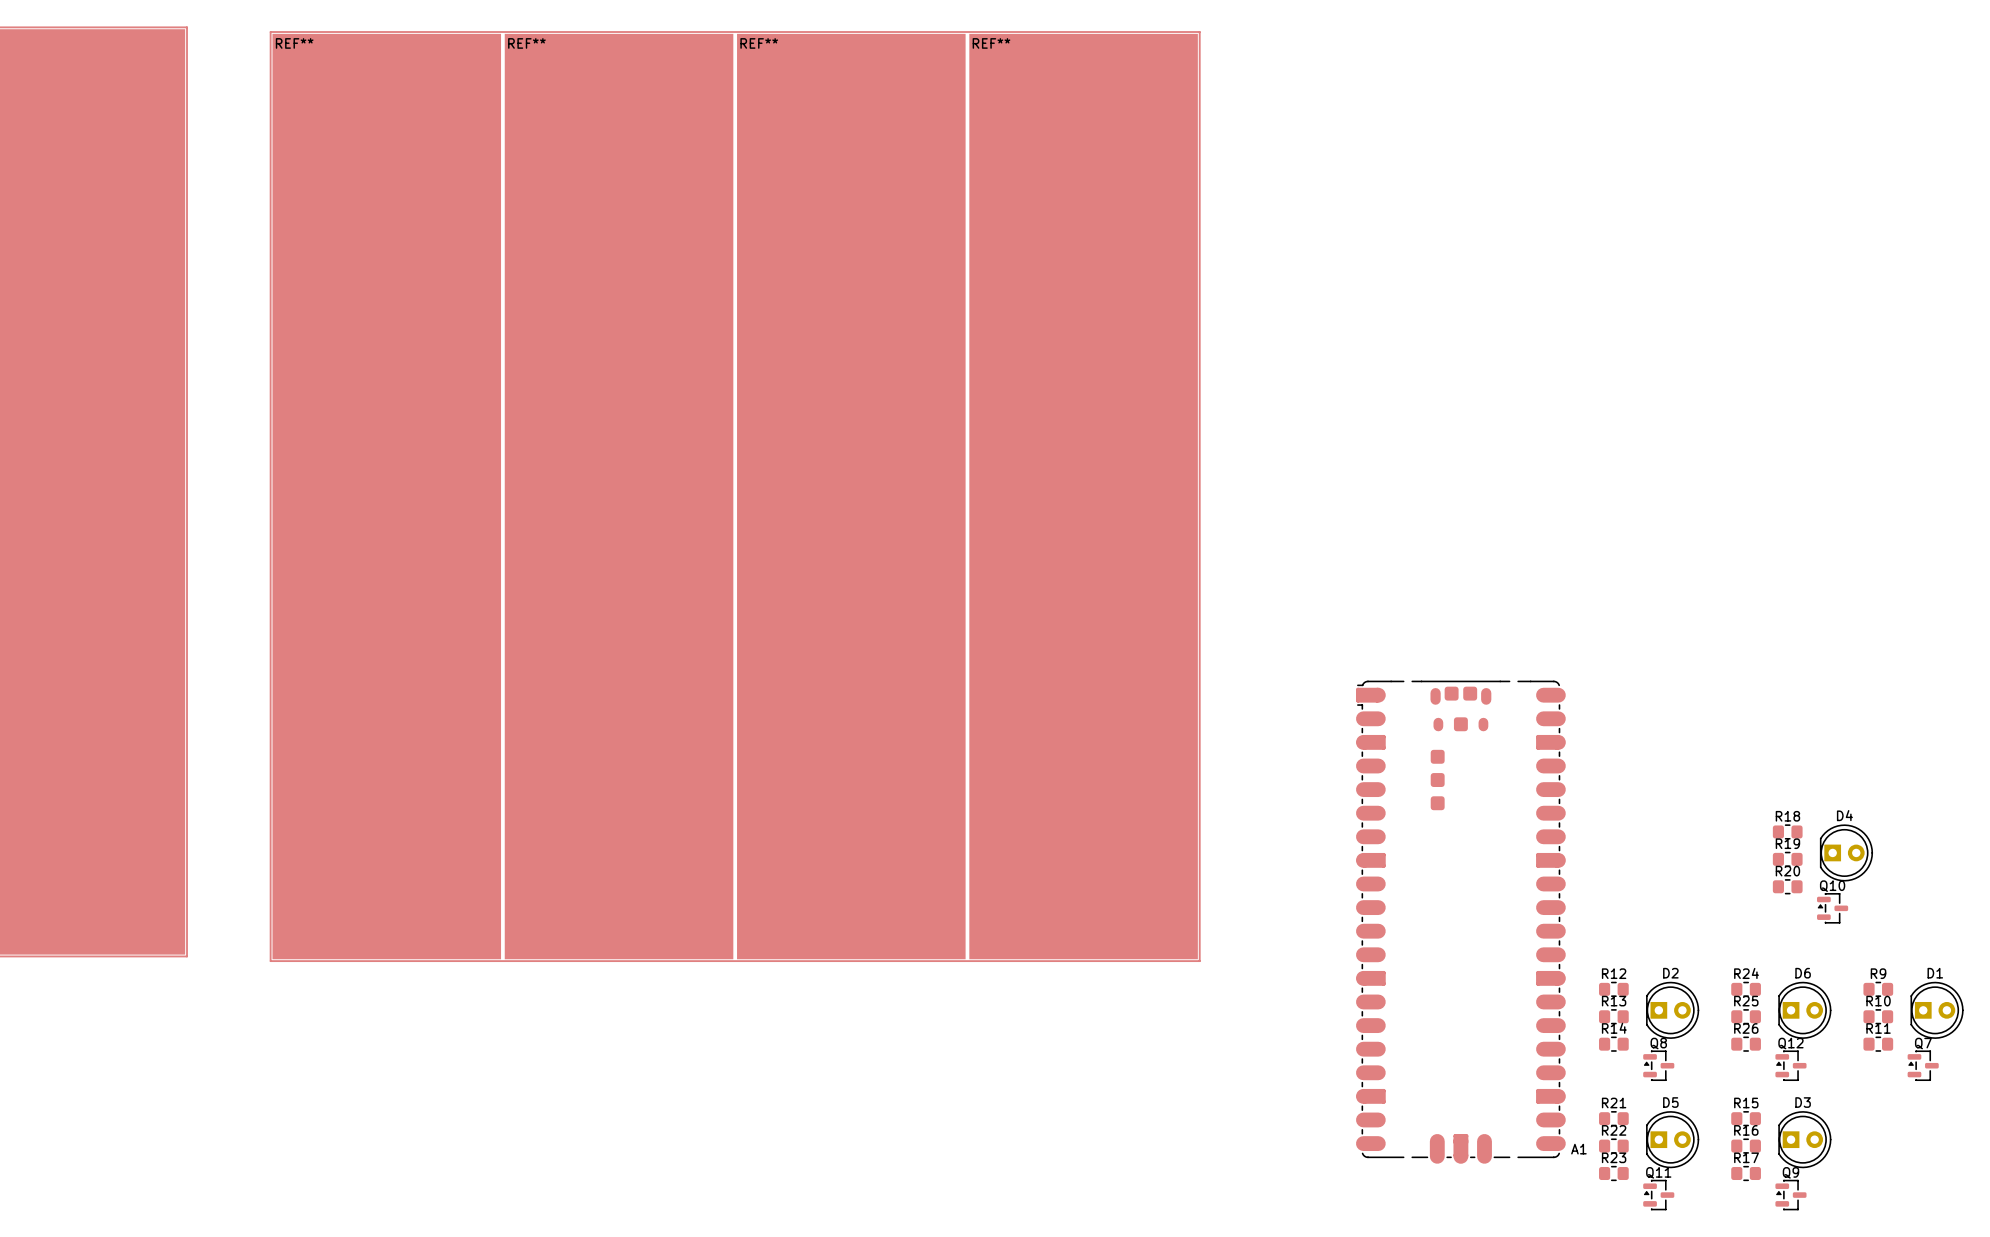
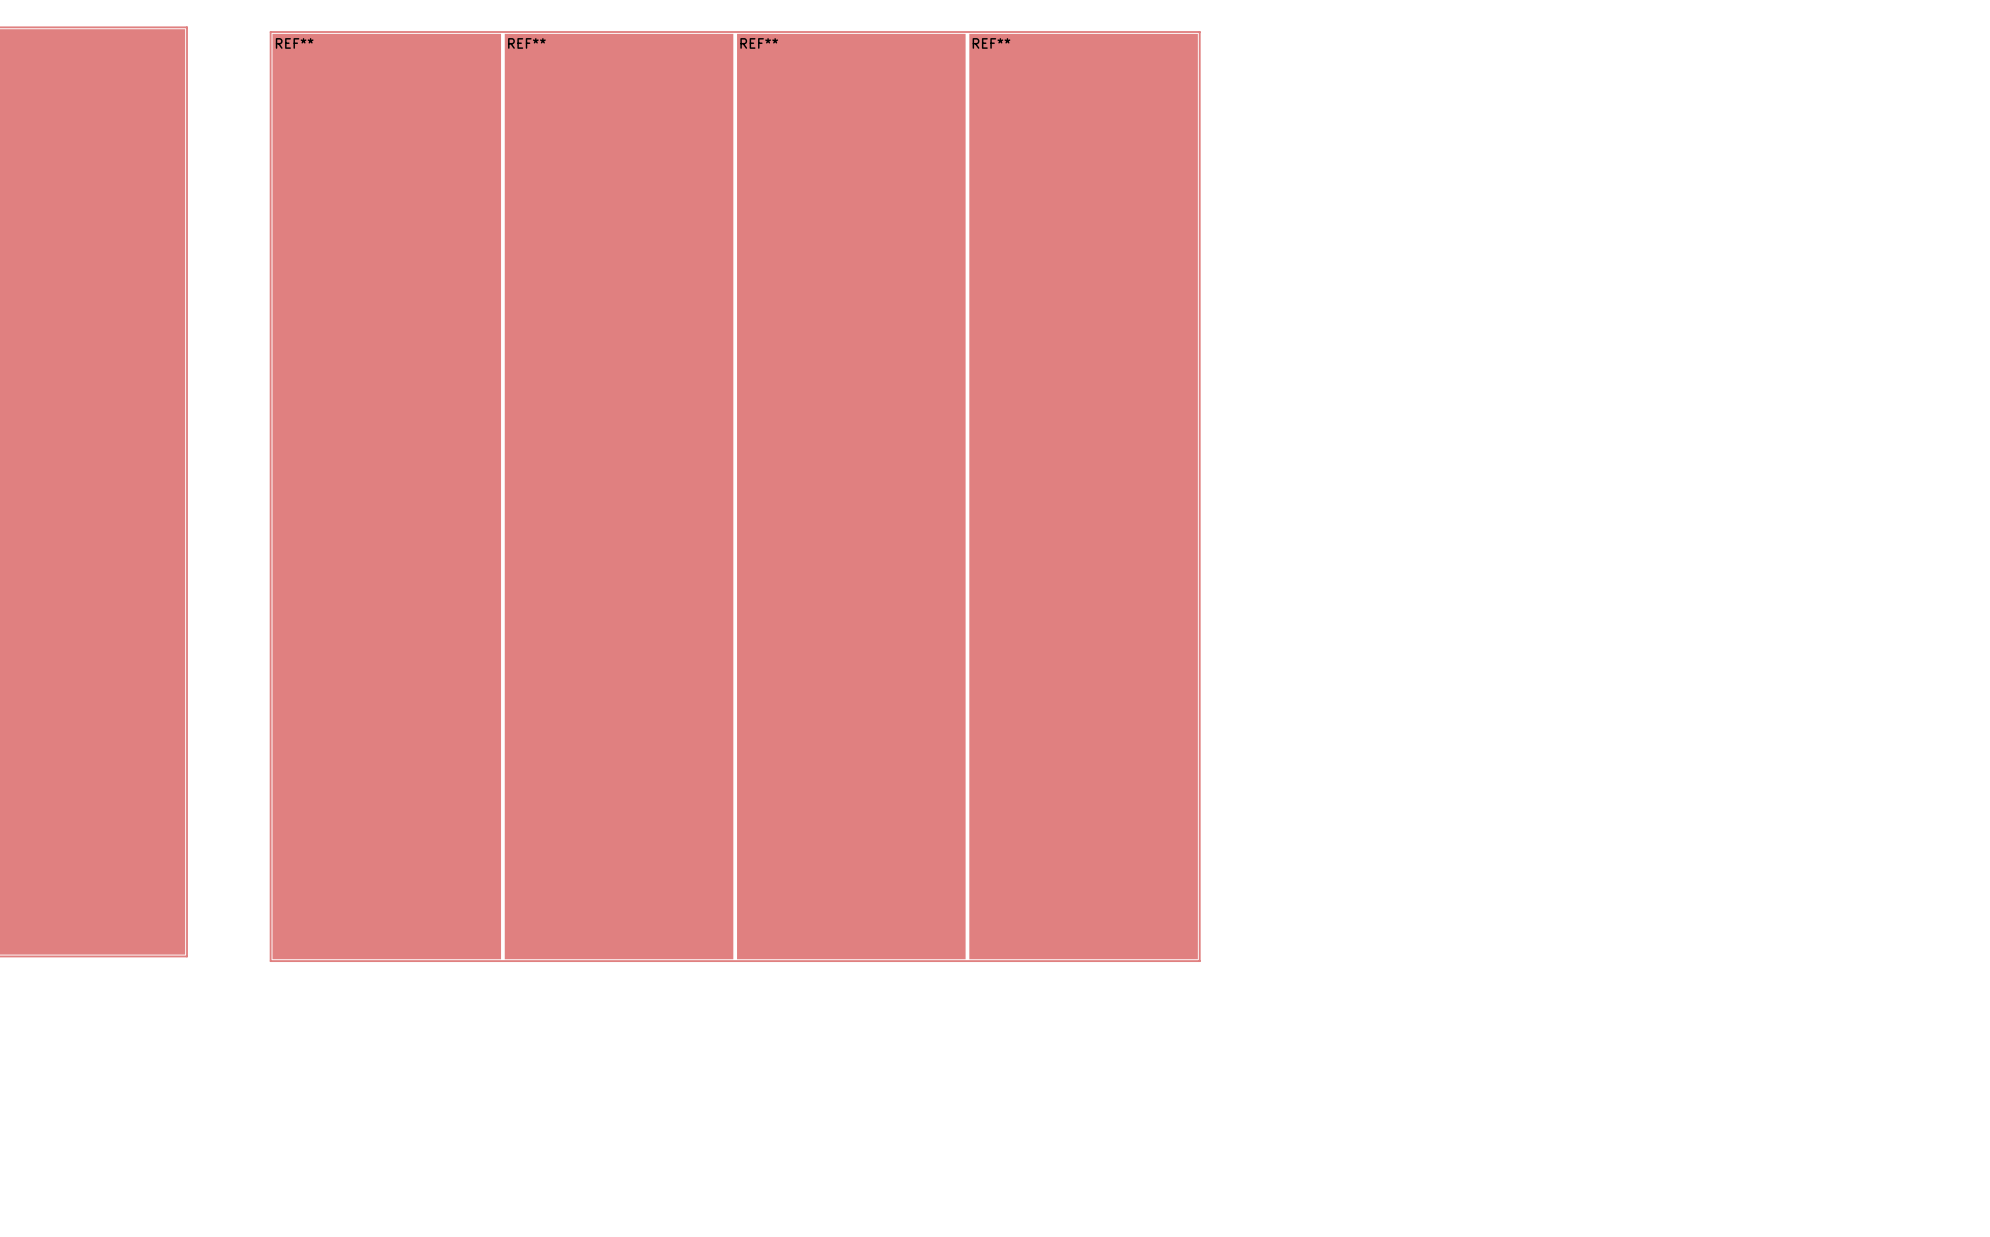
R18: (1787, 831) -> none
D4: (1846, 852) -> none
R19: (1787, 859) -> none
R20: (1787, 886) -> none
Q10: (1832, 908) -> none
A1: (1460, 922) -> none
R12: (1613, 989) -> none
R24: (1746, 989) -> none
R9: (1878, 989) -> none
D2: (1672, 1010) -> none
D6: (1804, 1010) -> none
D1: (1937, 1010) -> none
R13: (1613, 1016) -> none
R25: (1746, 1016) -> none
R10: (1878, 1016) -> none
R14: (1613, 1044) -> none
R26: (1746, 1044) -> none
R11: (1878, 1044) -> none
Q8: (1658, 1065) -> none
Q12: (1790, 1065) -> none
Q7: (1923, 1065) -> none
R21: (1613, 1118) -> none
R15: (1746, 1118) -> none
D5: (1672, 1139) -> none
D3: (1804, 1139) -> none
R22: (1613, 1146) -> none
R16: (1746, 1146) -> none
R23: (1613, 1173) -> none
R17: (1746, 1173) -> none
Q11: (1658, 1195) -> none
Q9: (1790, 1195) -> none

